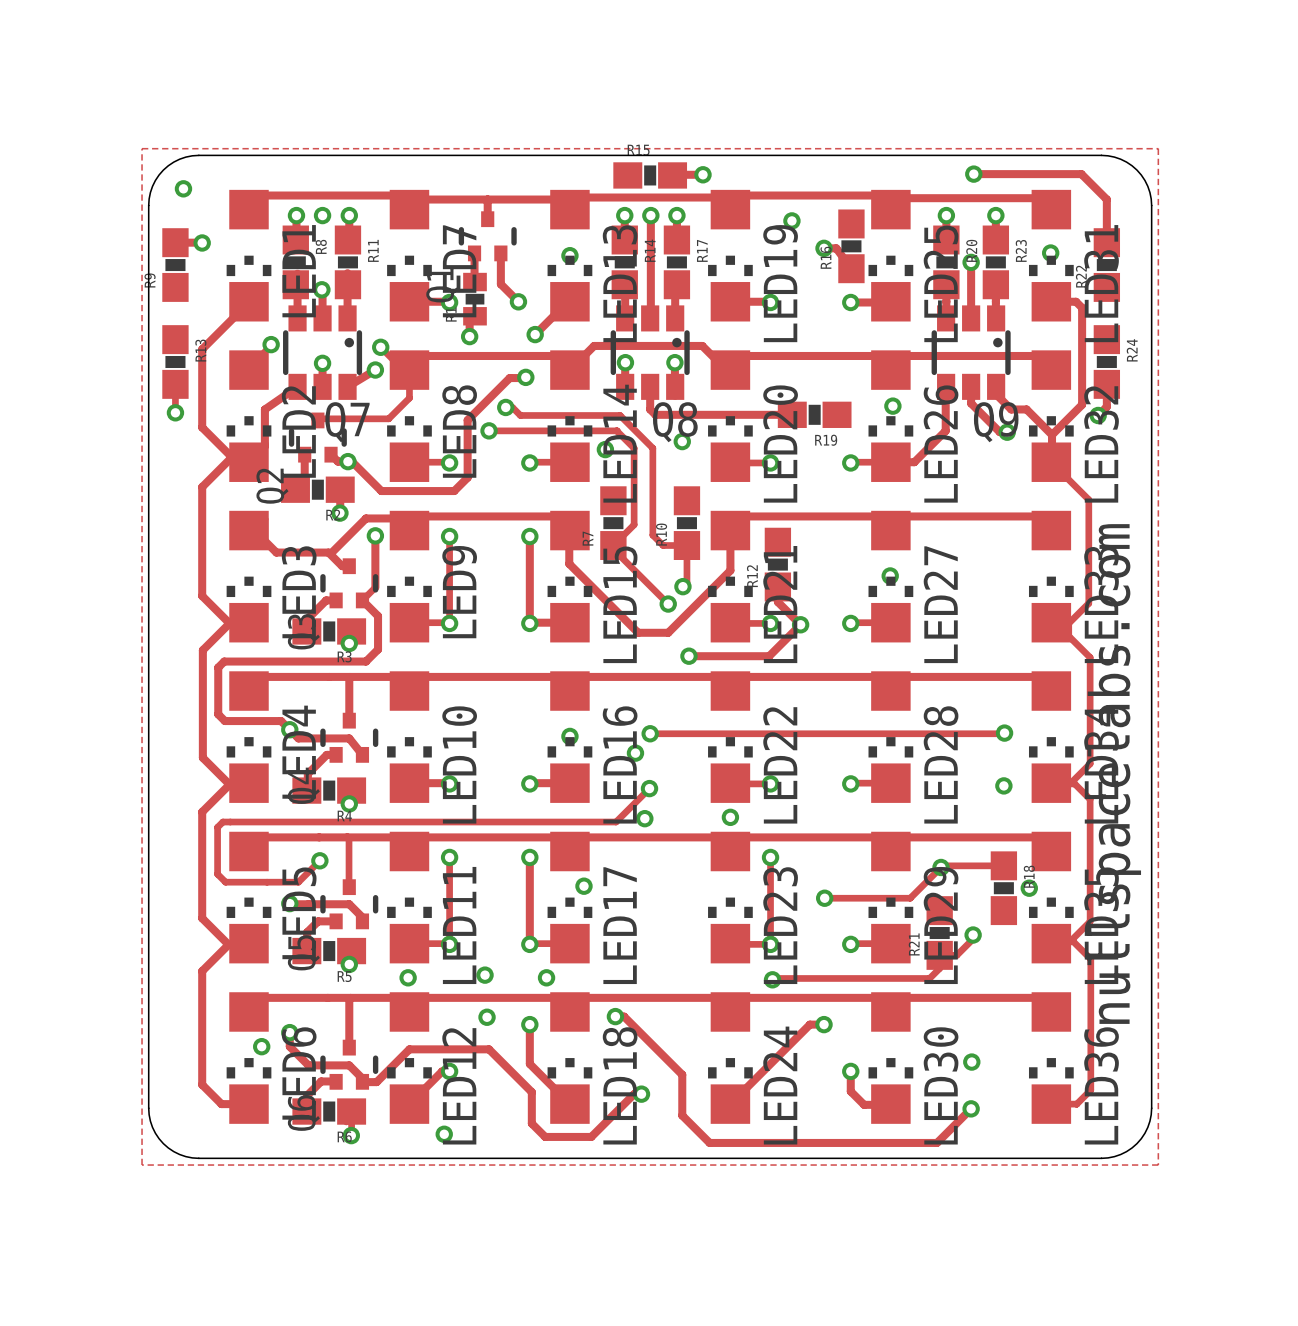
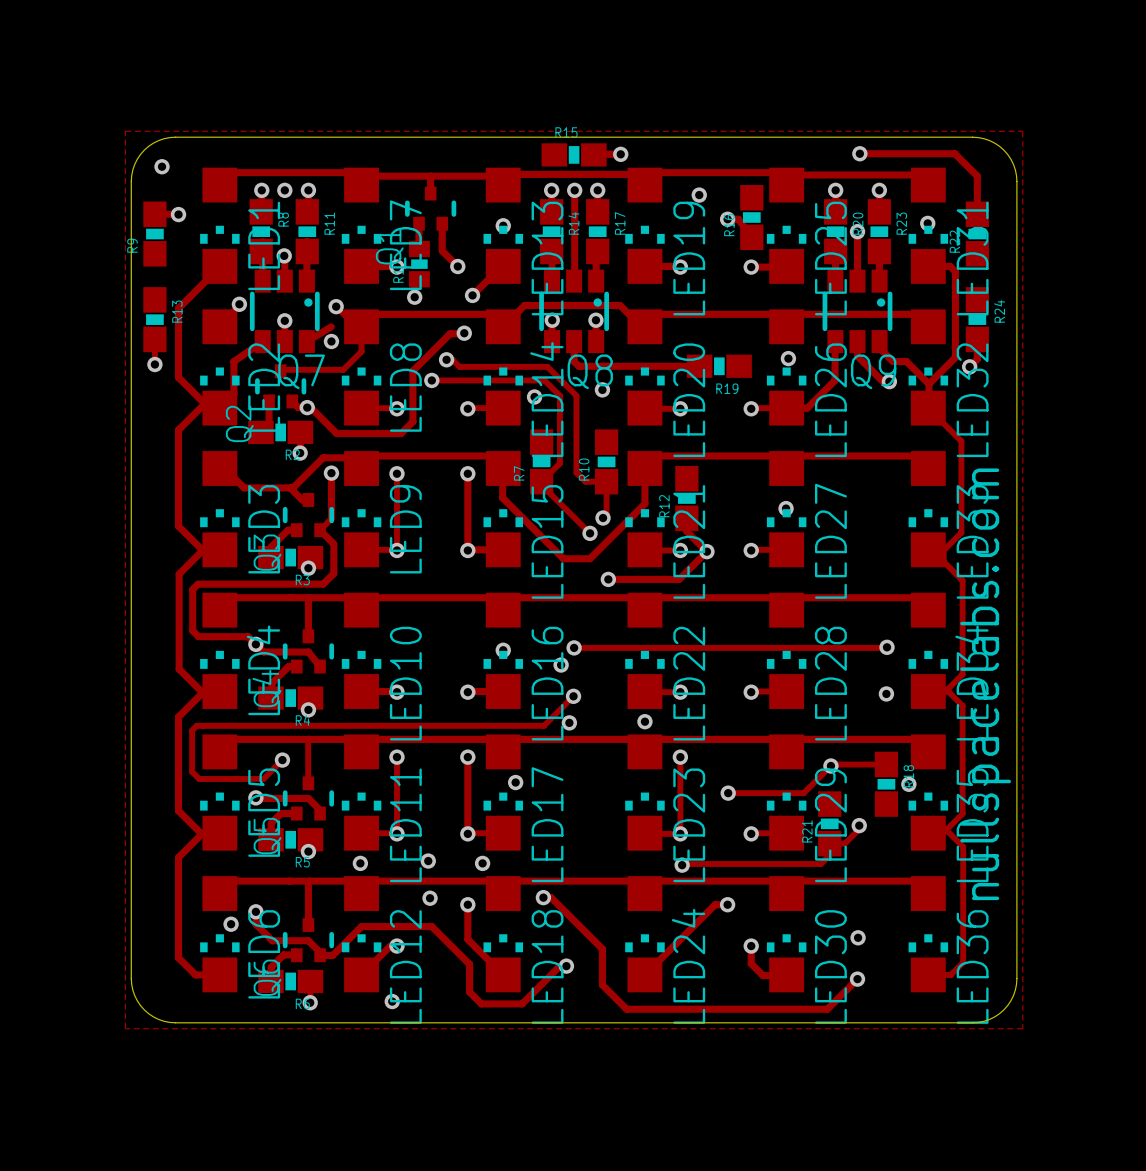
via position: (375, 370) -> (331, 341)

